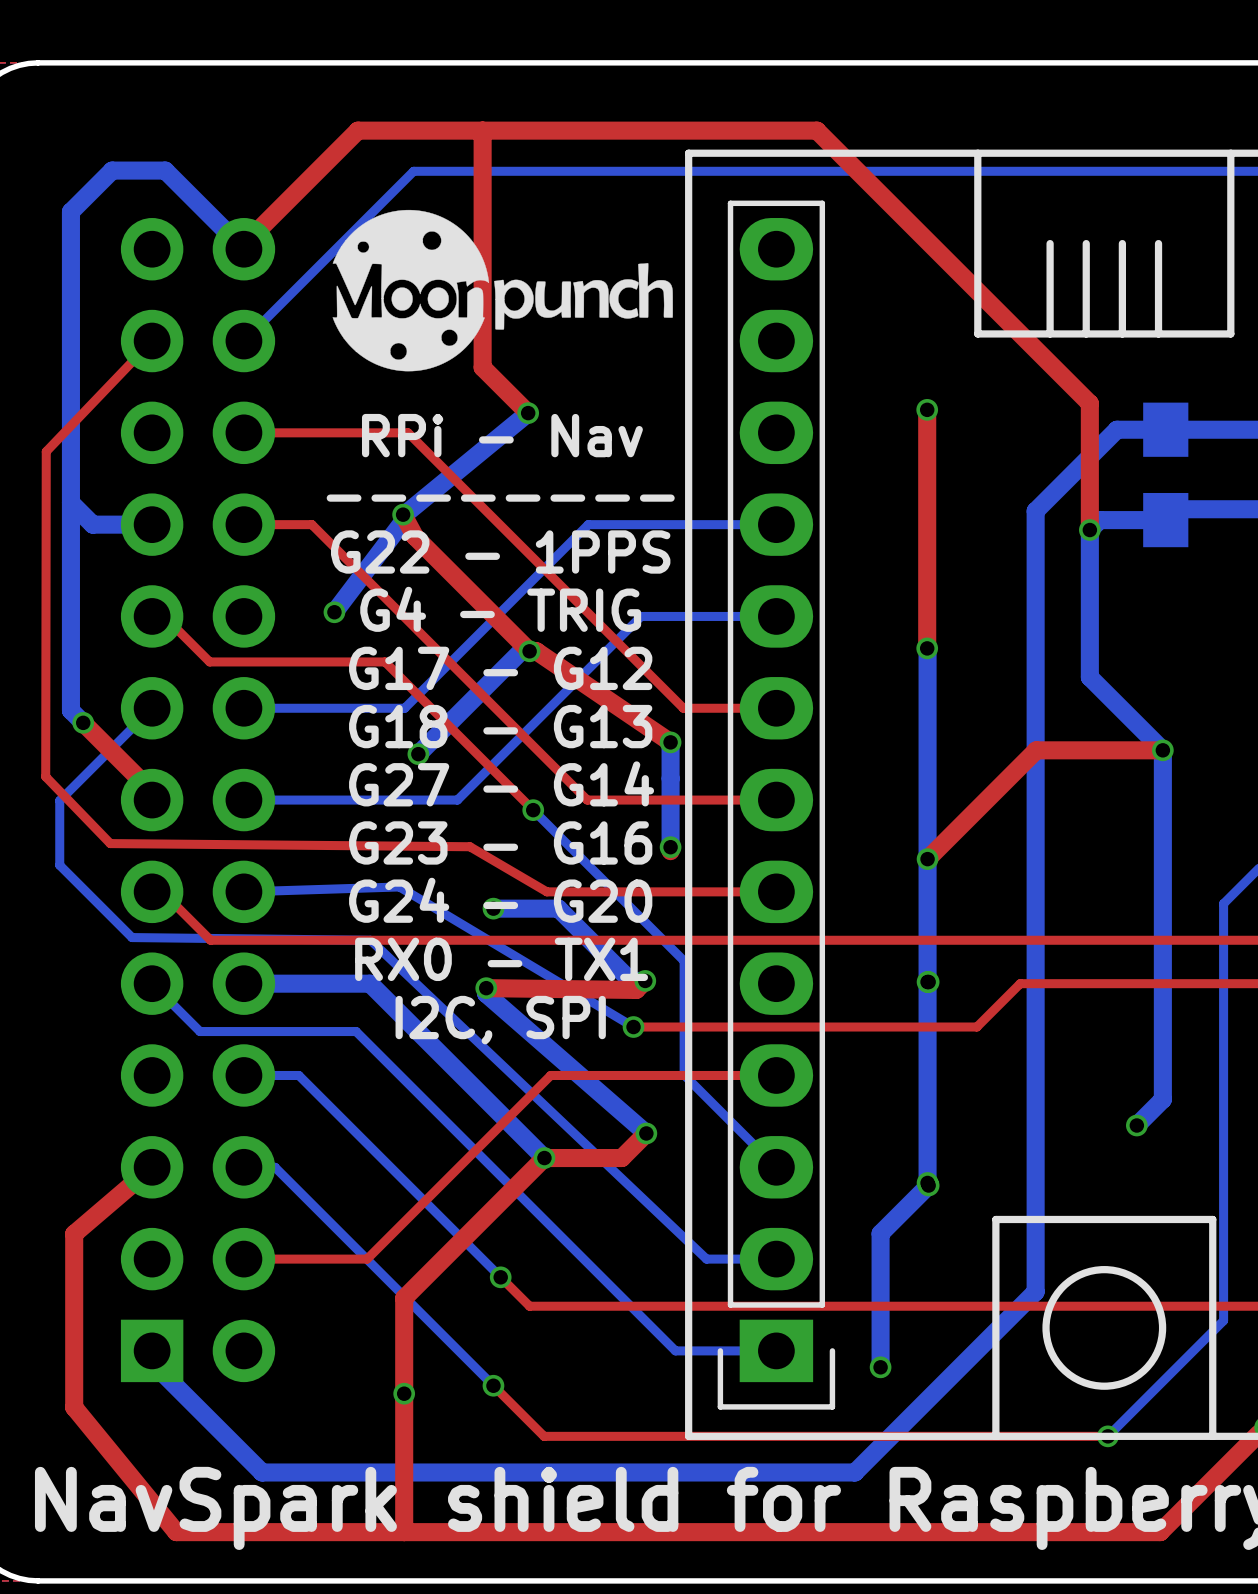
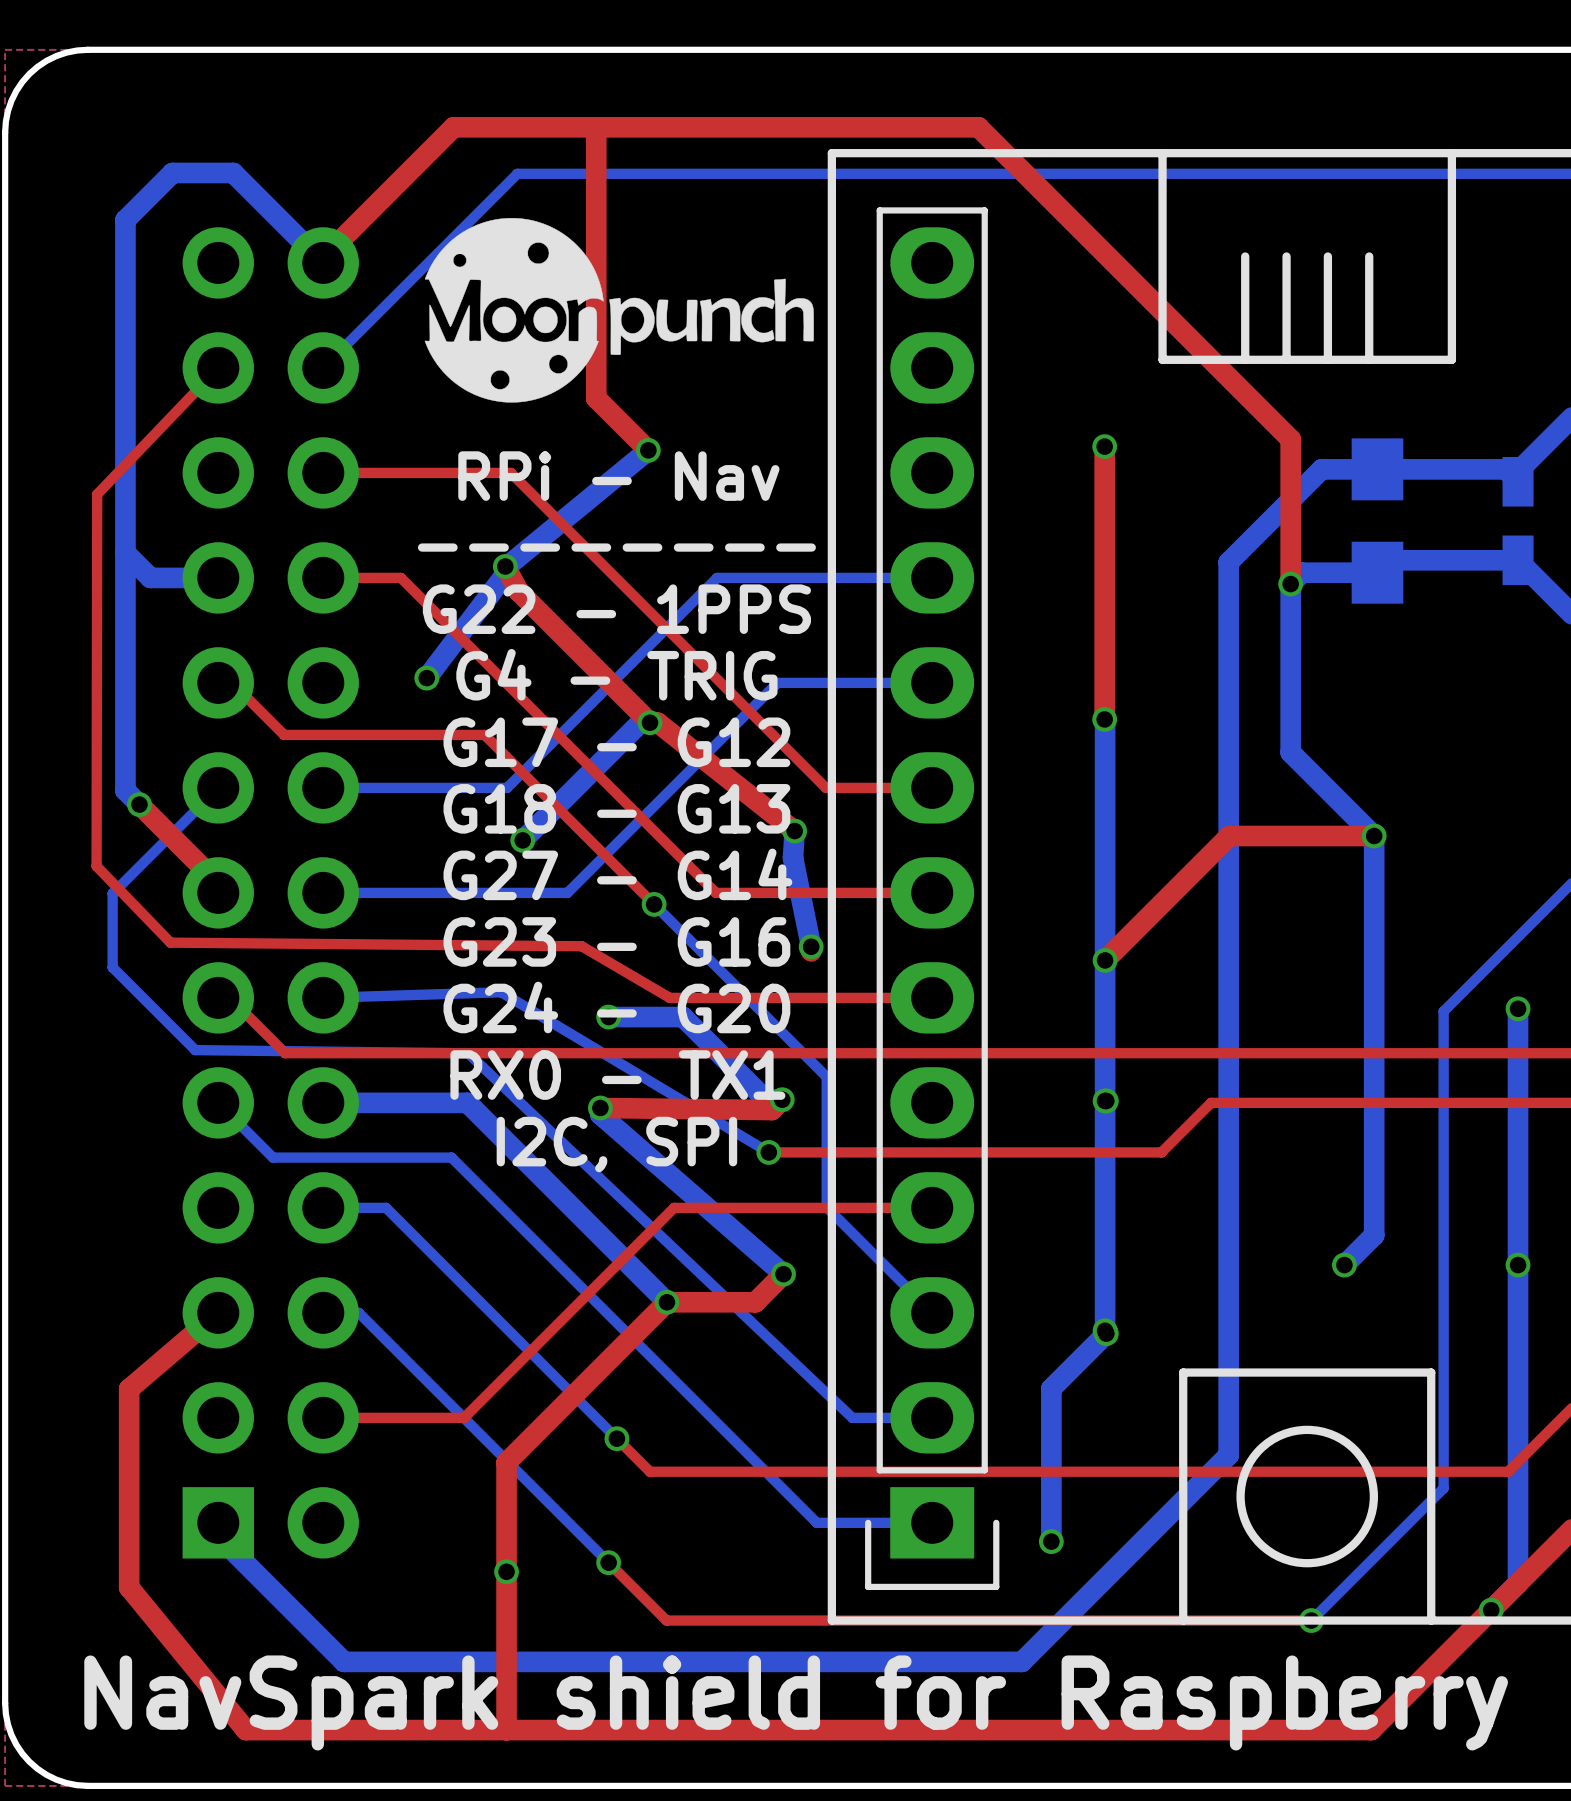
top track: (536, 651) (670, 742) -> (657, 722) (794, 831)
bottom track: (670, 742) (670, 847) -> (794, 831) (793, 857) (811, 946)
via position: (670, 742) -> (794, 831)

